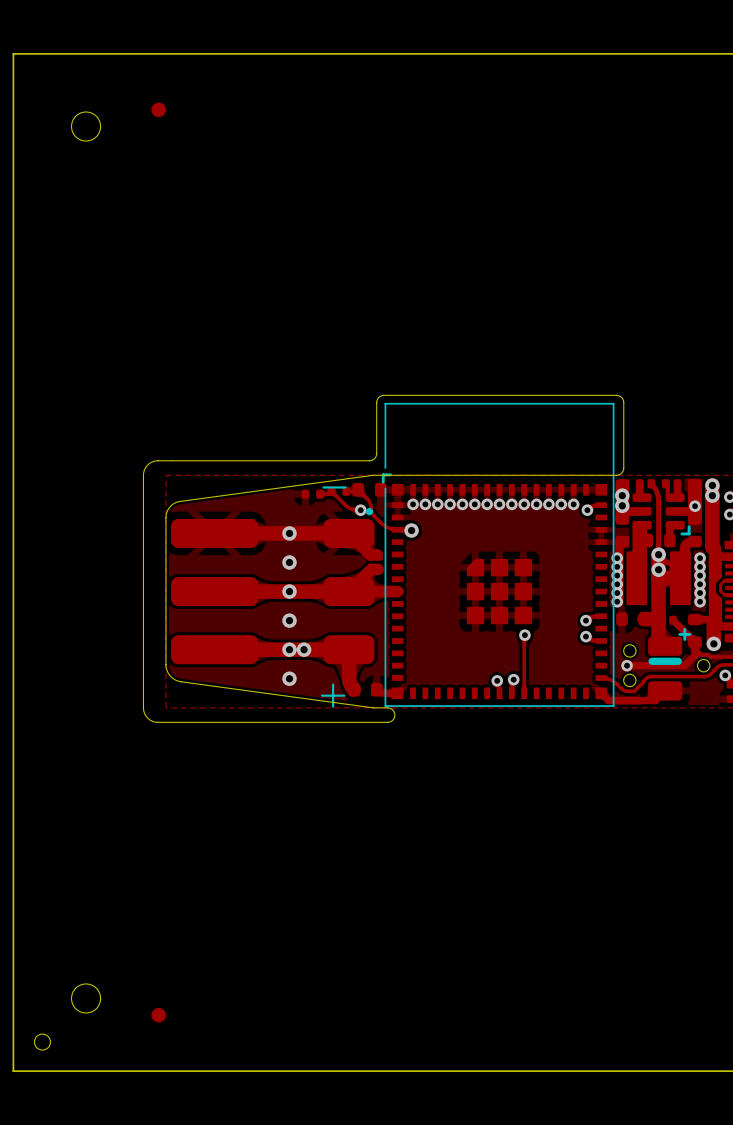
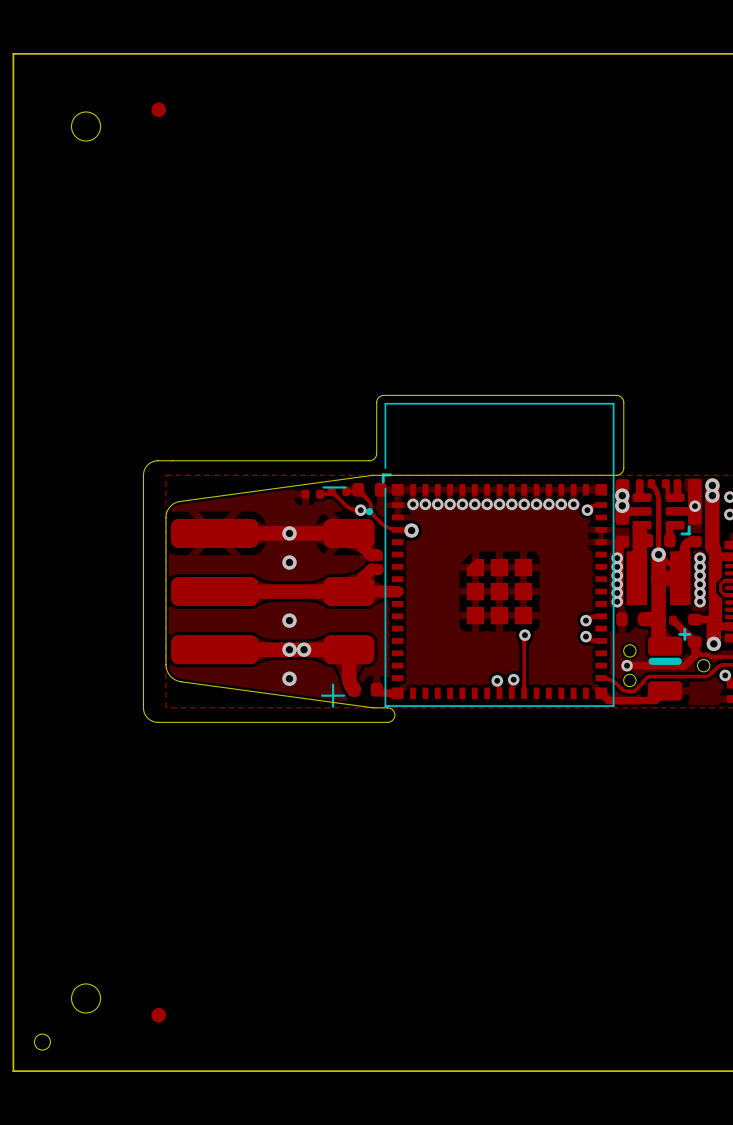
via: (658, 569) -> none
via: (289, 591) -> none

